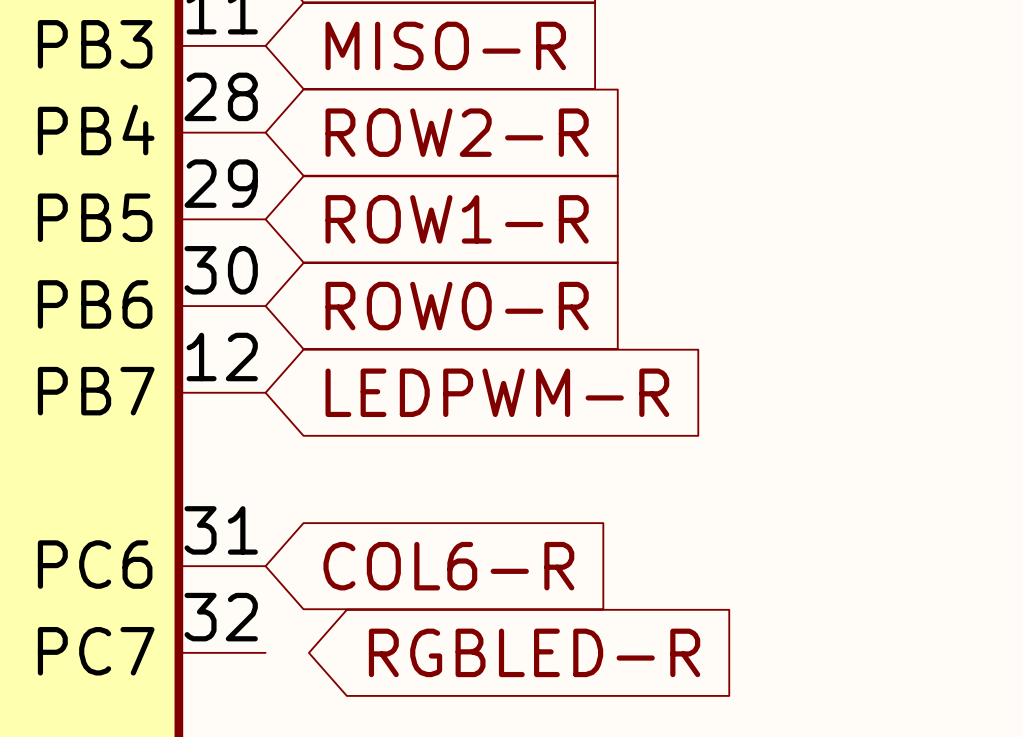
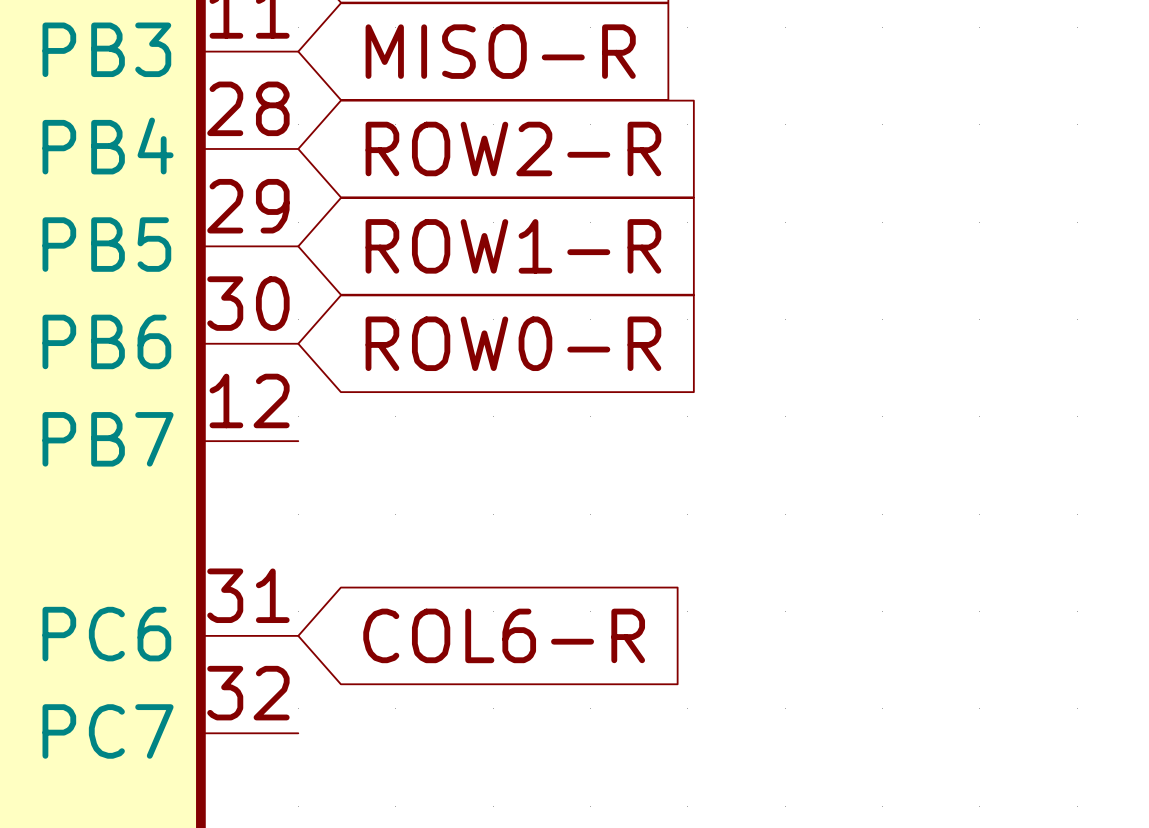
global label: LEDPWM-R (497, 392) -> none
global label: RGBLED-R (534, 652) -> none

